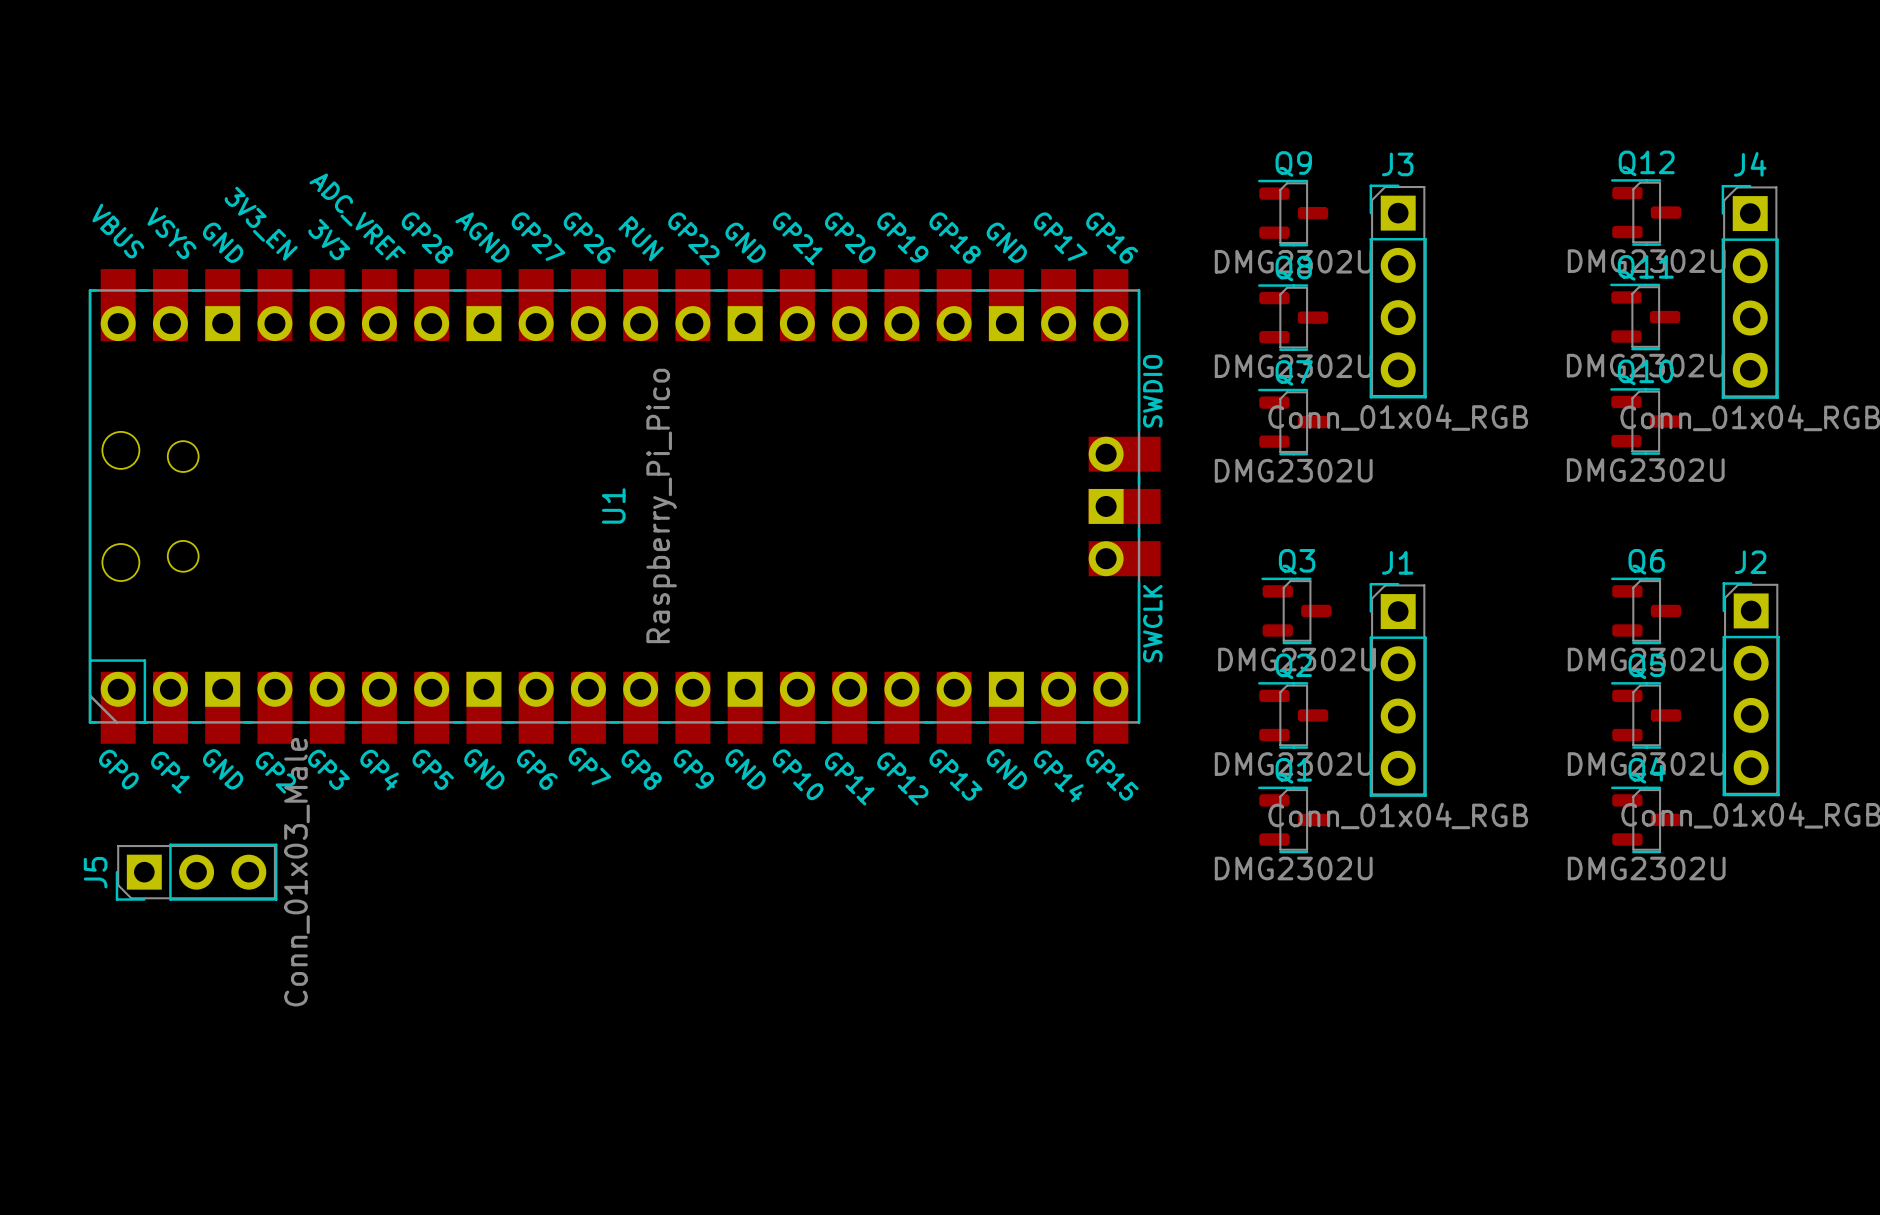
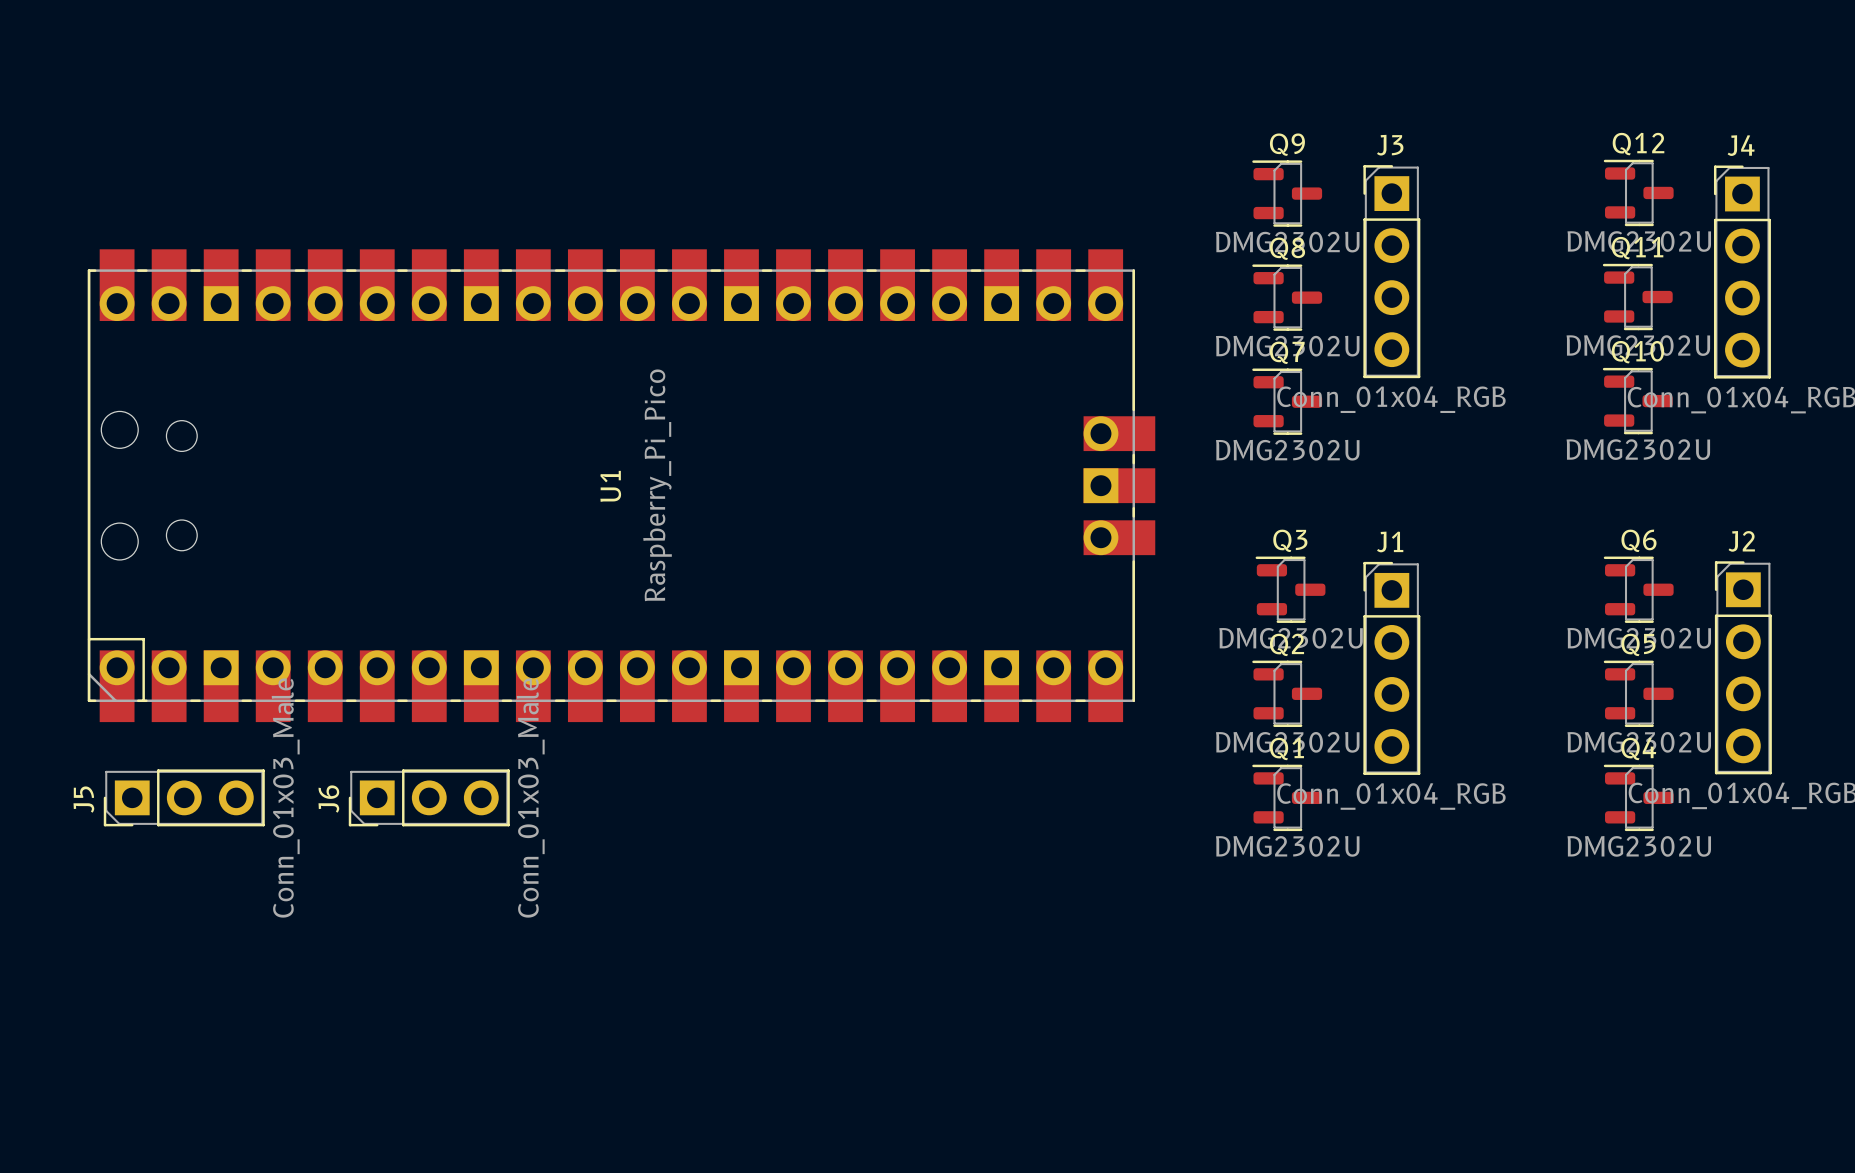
U1 footprint: [88, 269, 1161, 744] -> [87, 249, 1156, 723]
J6: none -> Conn_01x03_Male (429, 797)
J5 position: (196, 872) -> (184, 797)

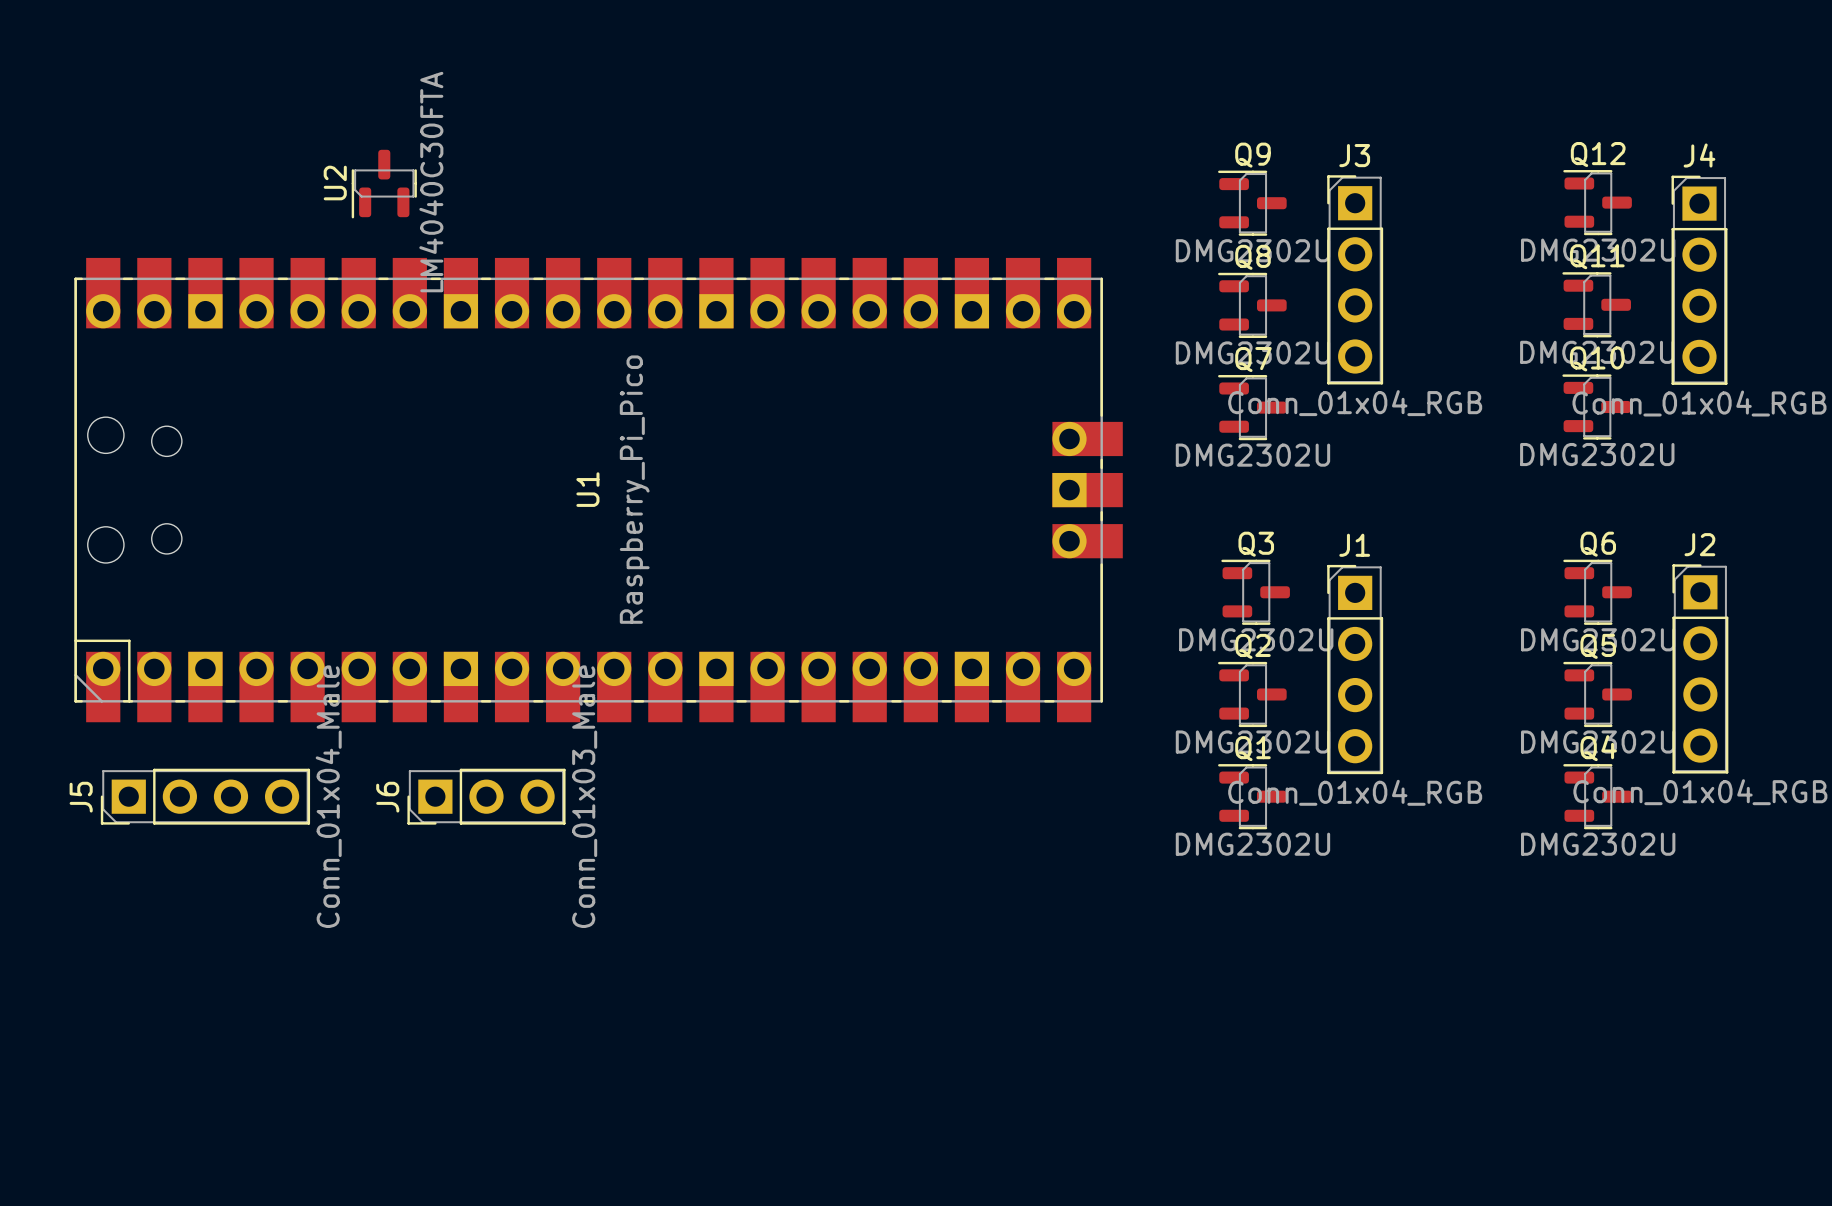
U2: none -> LM4040C30FTA (384, 184)
J5 footprint: [103, 769, 265, 827] -> [100, 768, 311, 825]
J6 position: (429, 797) -> (486, 796)
J5 value: Conn_01x03_Male (285, 798) -> Conn_01x04_Male (328, 796)

